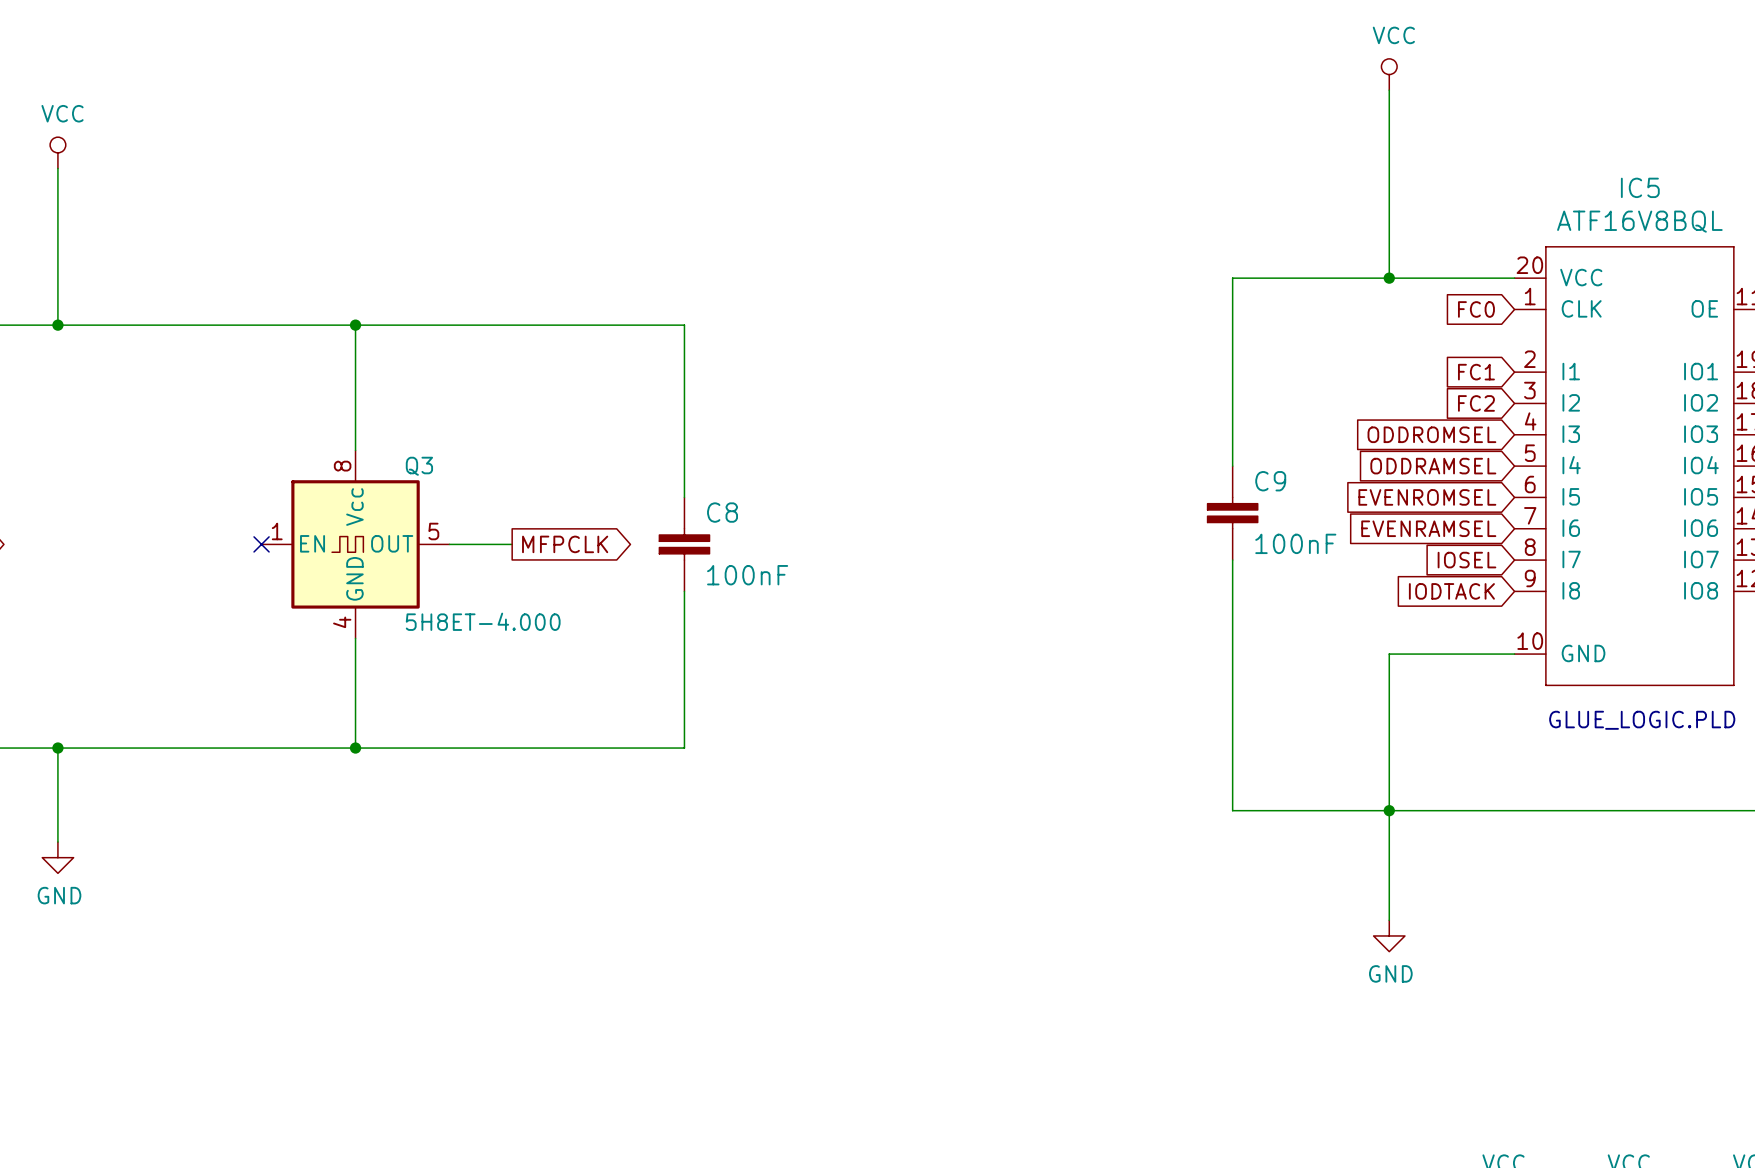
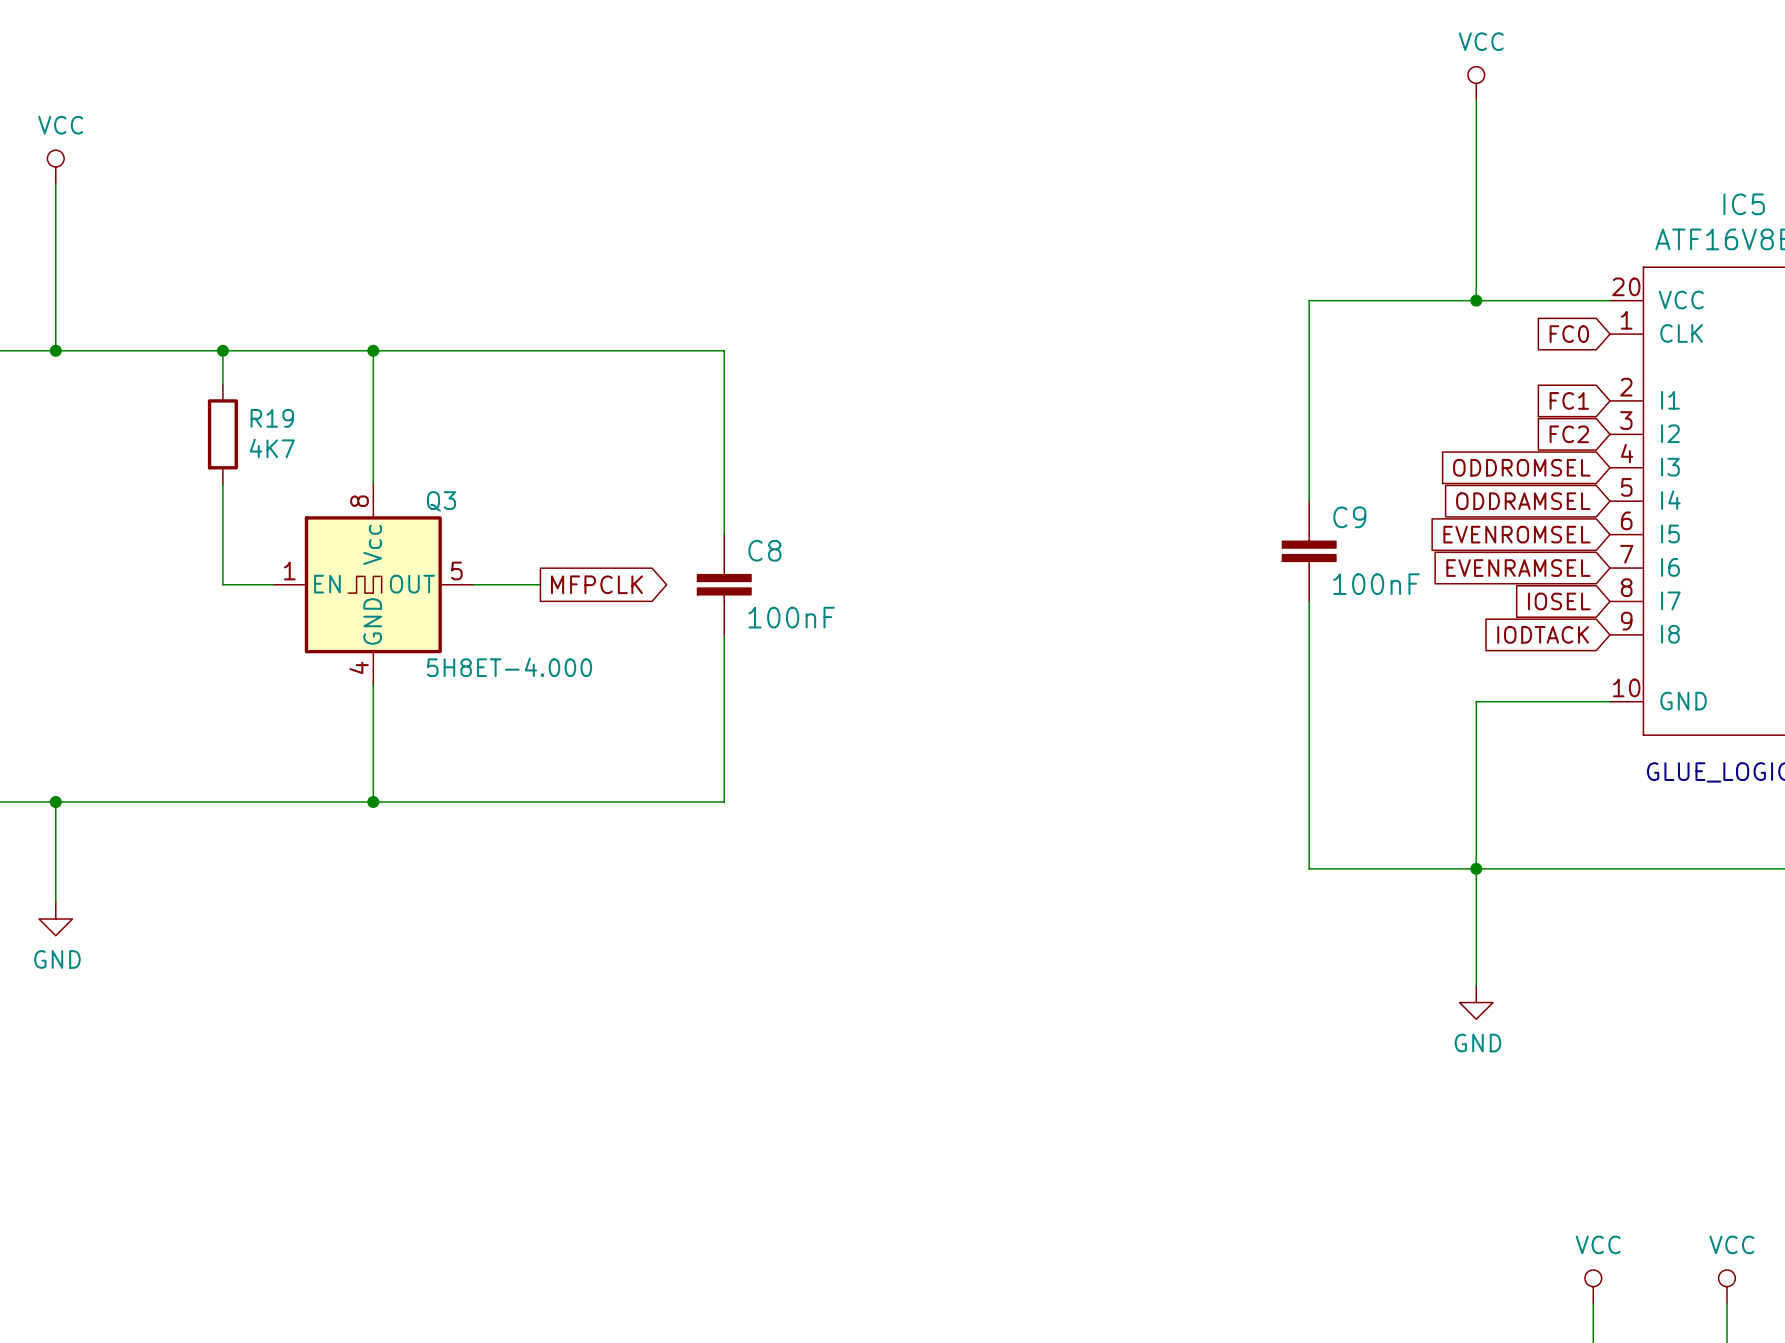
wire: none -> (222, 350) (222, 384)
junction: none -> (222, 350)
R19: none -> 4K7 (222, 434)
wire: none -> (222, 484) (222, 584) (273, 584)
no-connect mark: (261, 544) -> none

